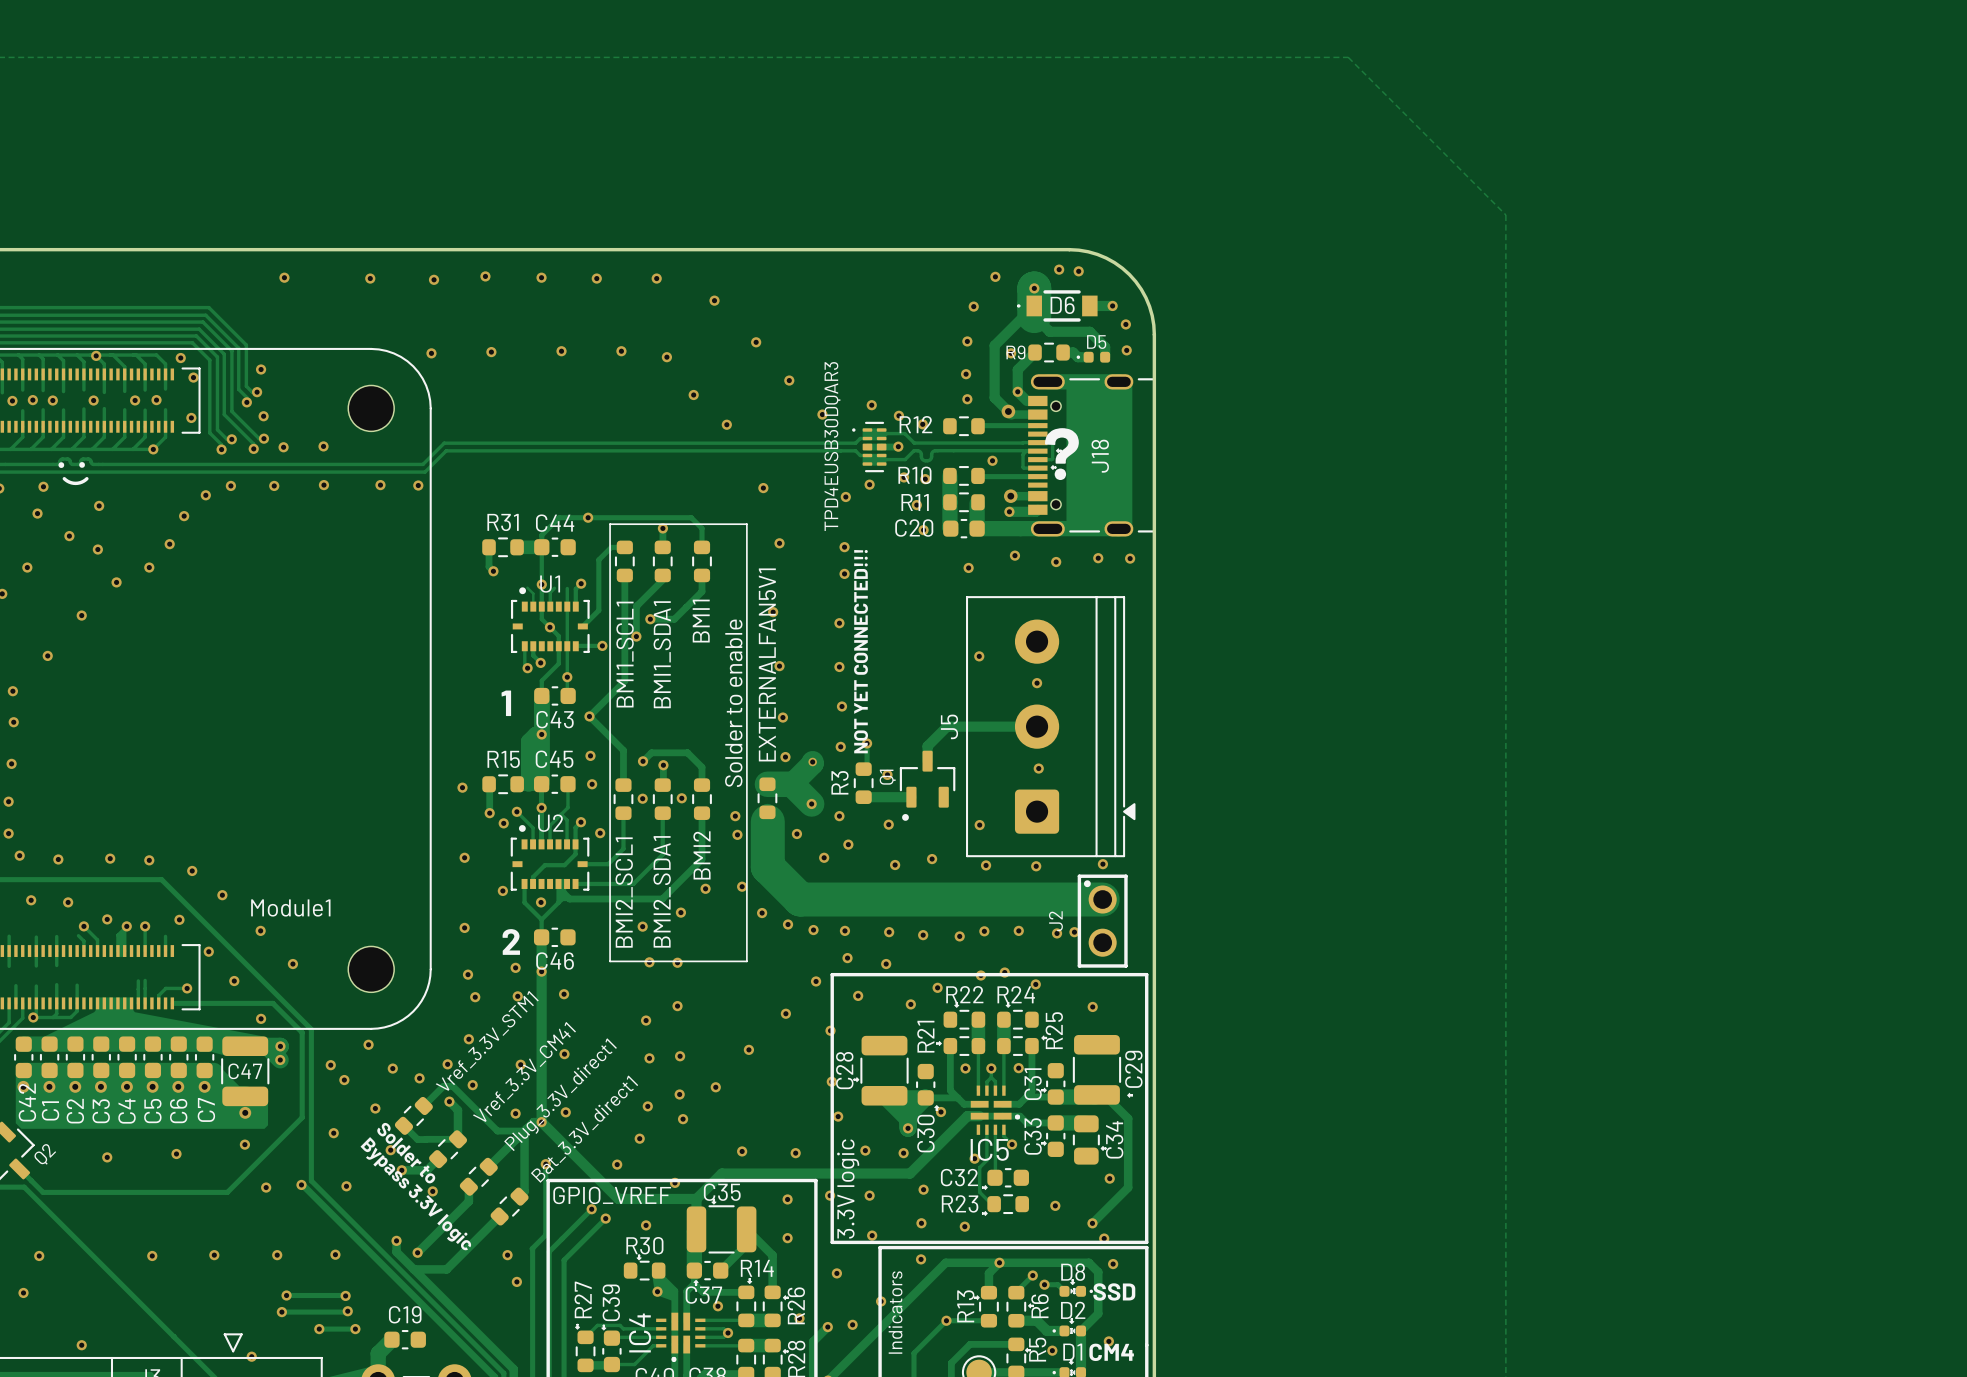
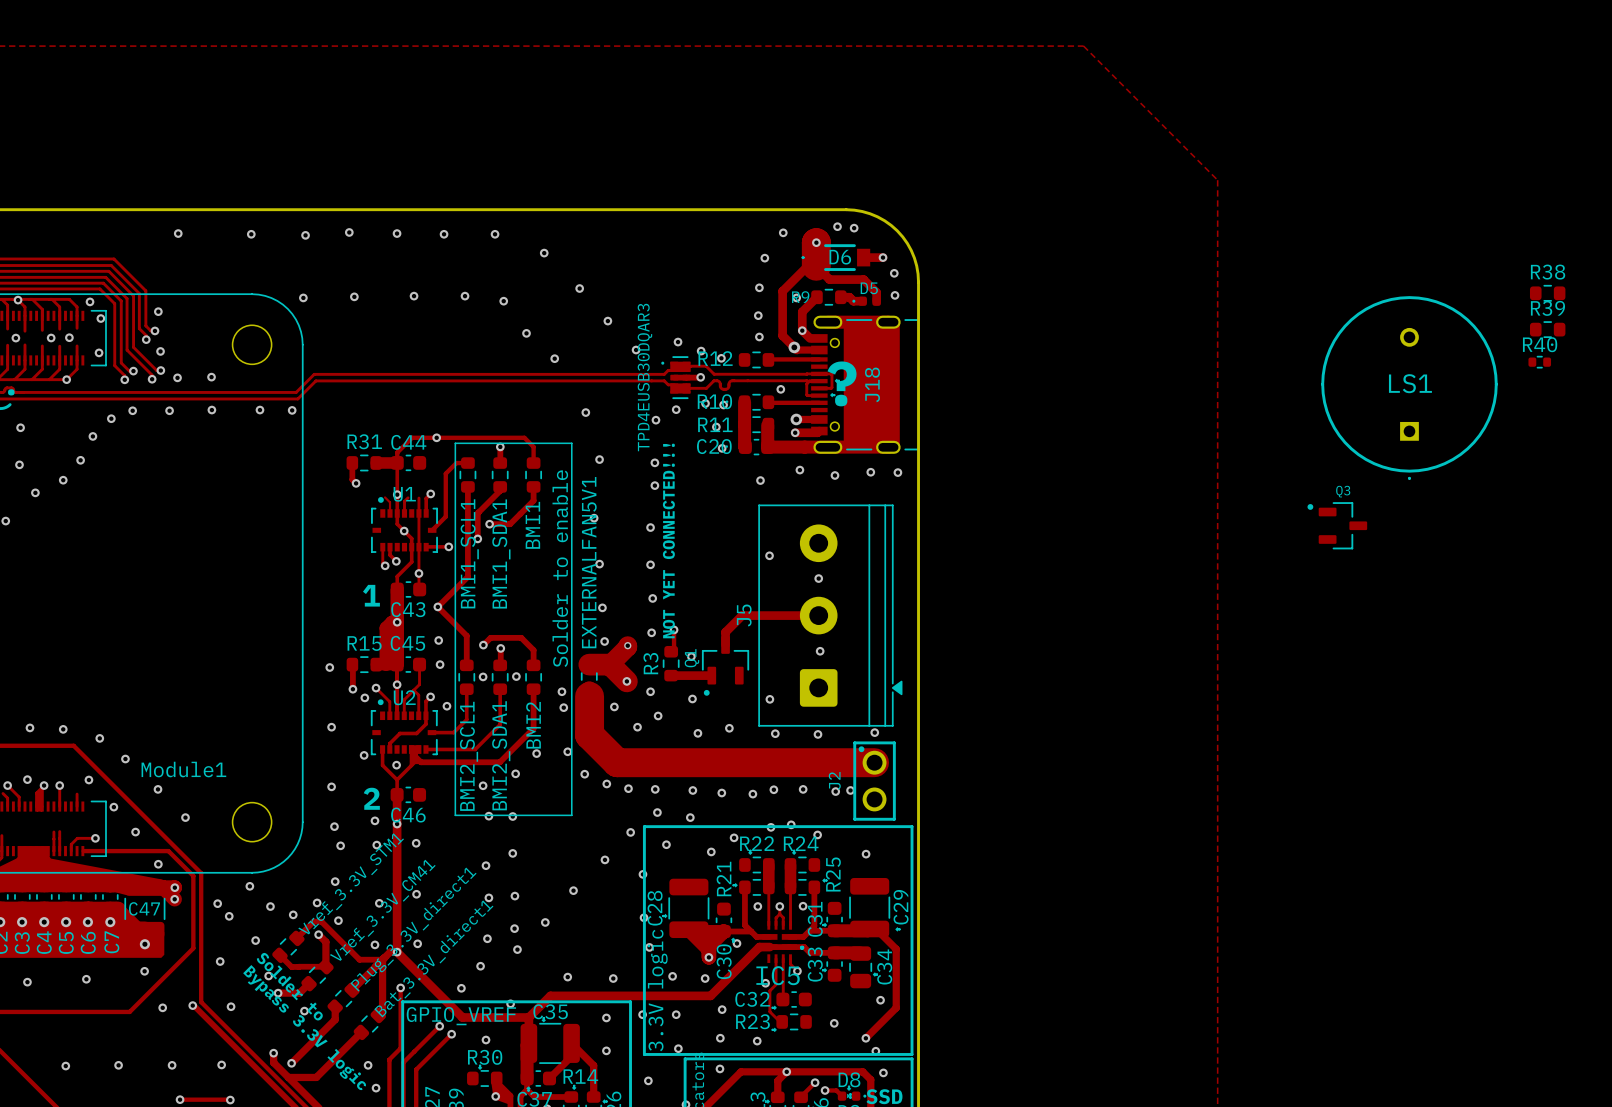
R38: none -> (1547, 293)
R39: none -> (1547, 329)
R40: none -> (1539, 362)
LS1: none -> (1409, 387)
Q3: none -> (1337, 525)

